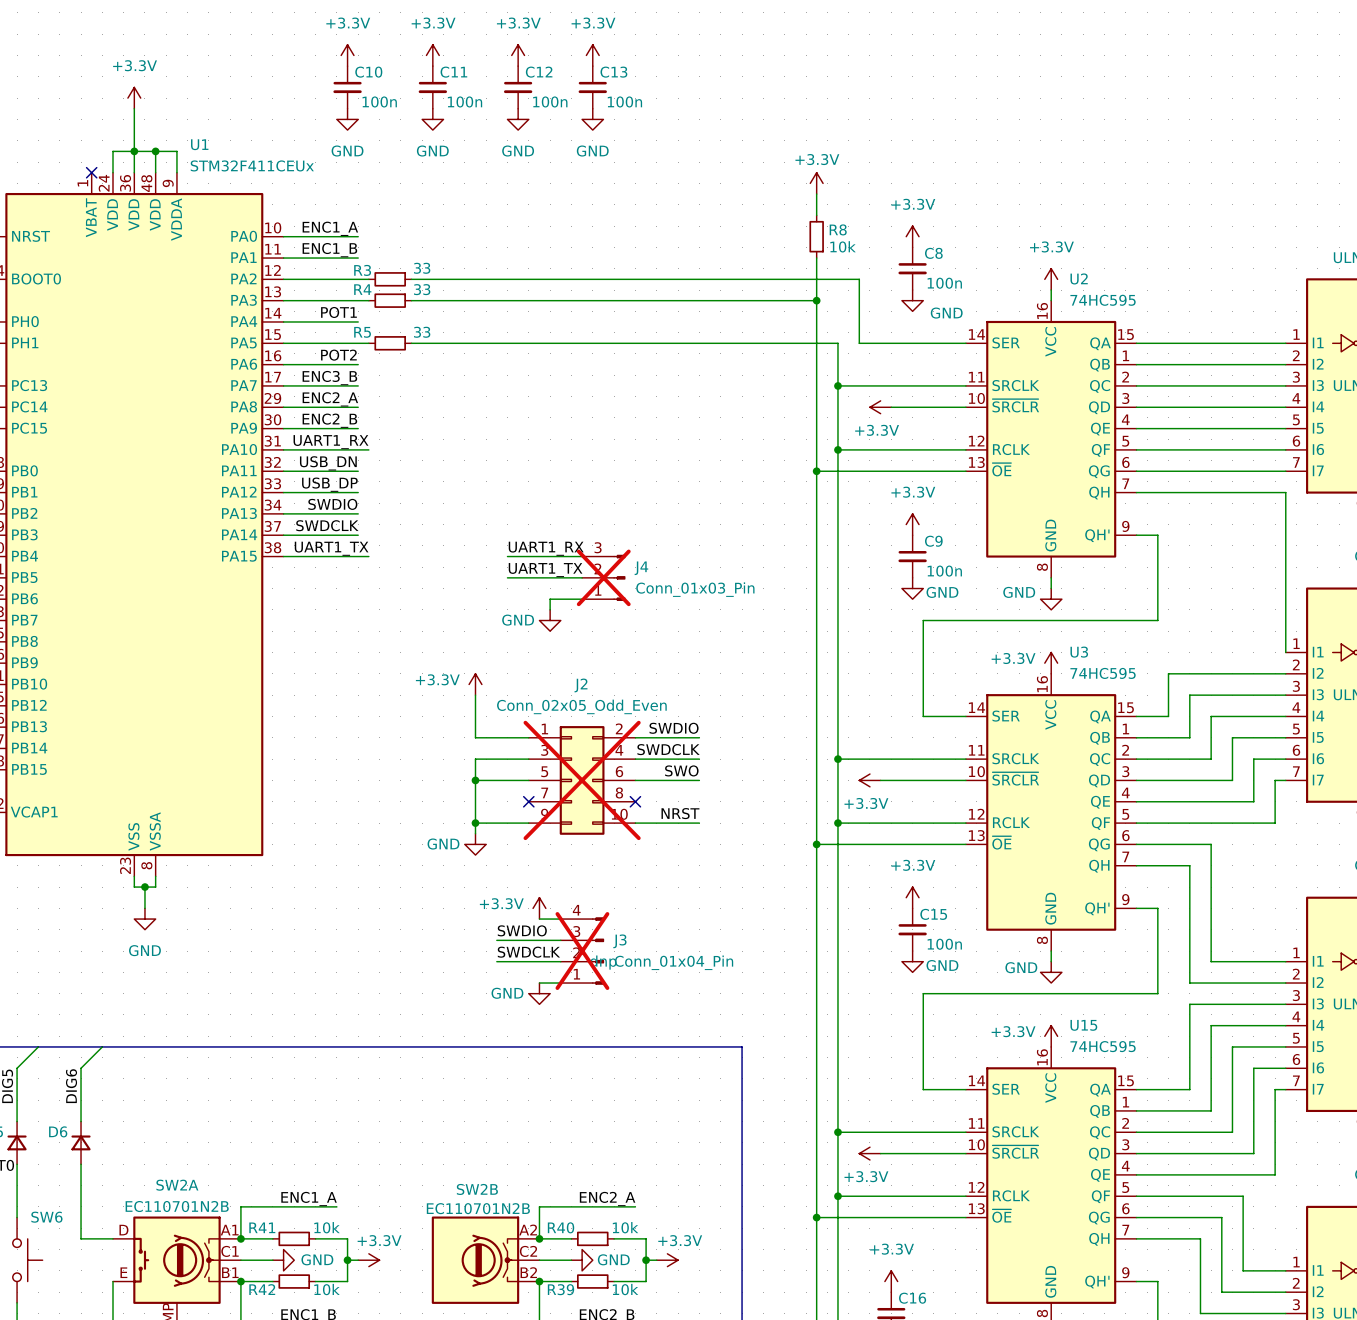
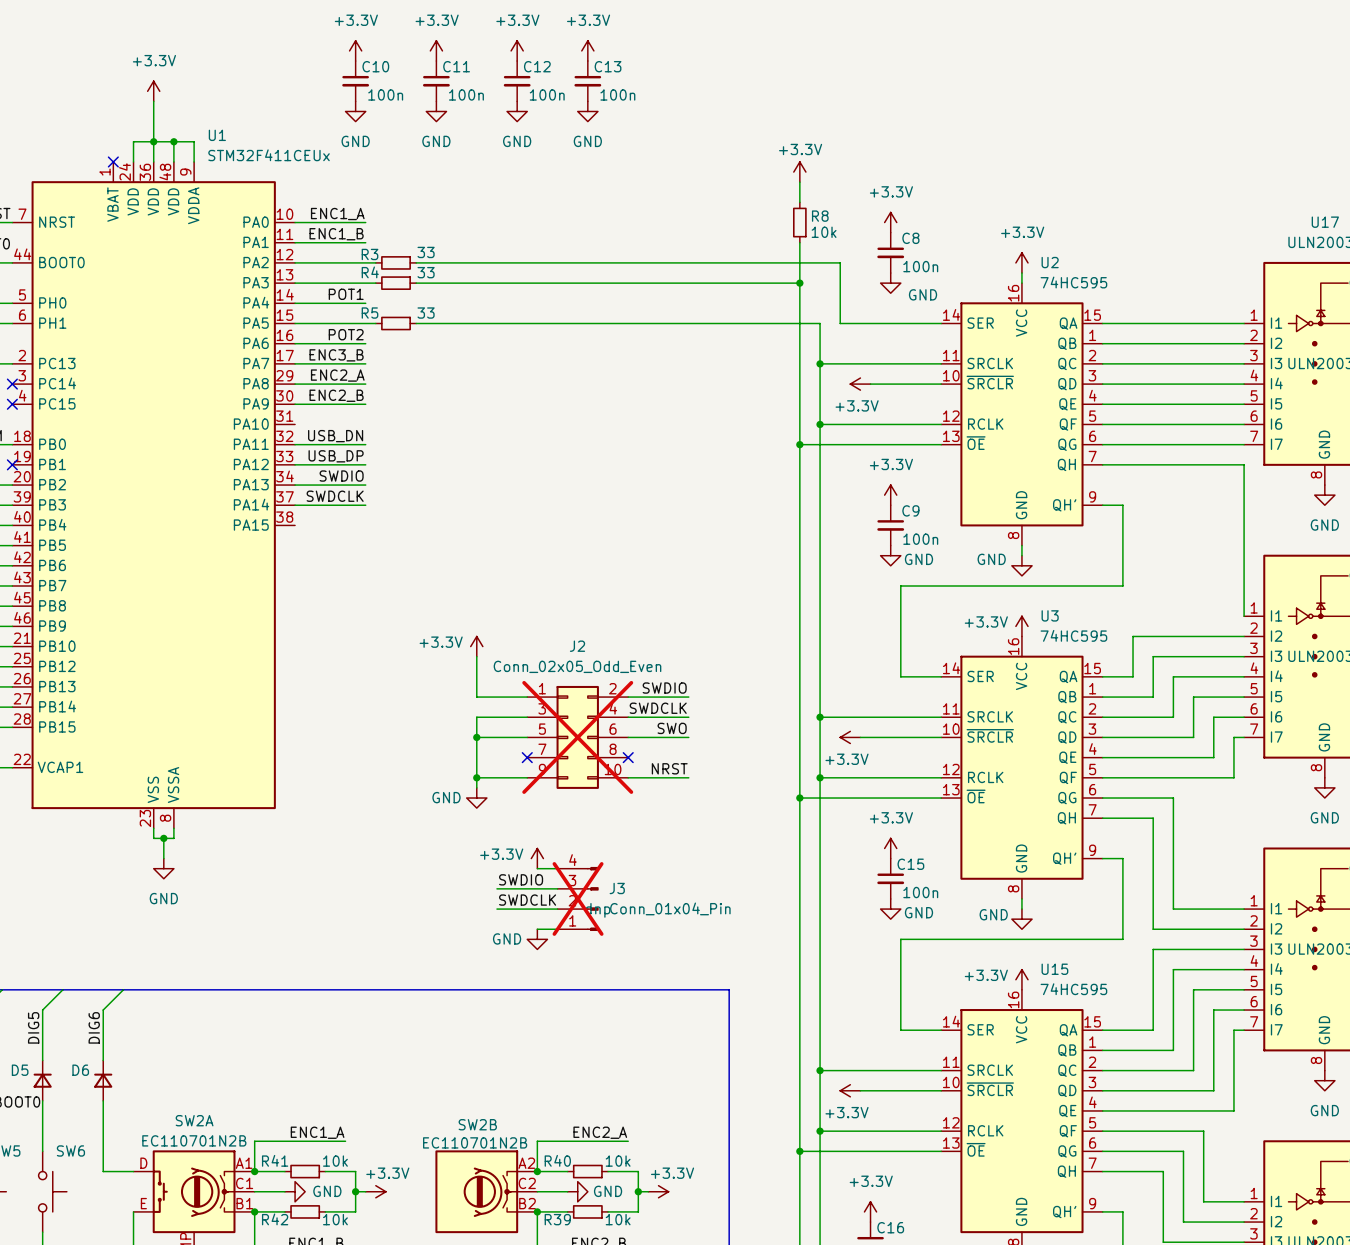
label: UART1_RX (330, 442) -> none
wire: (283, 449) (368, 449) -> none
label: UART1_TX (331, 548) -> none
label: UART1_RX (546, 548) -> none
wire: (283, 556) (368, 556) -> none
wire: (507, 556) (582, 556) -> none
label: UART1_TX (545, 570) -> none
wire: (507, 577) (582, 577) -> none
J4: Conn_01x03_Pin (603, 577) -> none
wire: (582, 599) (550, 599) (550, 609) -> none
power symbol: GND (550, 620) -> none

